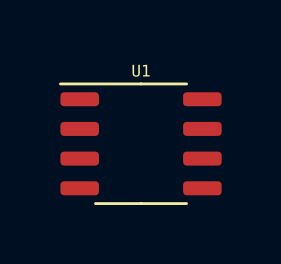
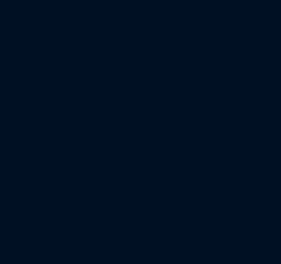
U1: (140, 143) -> none

